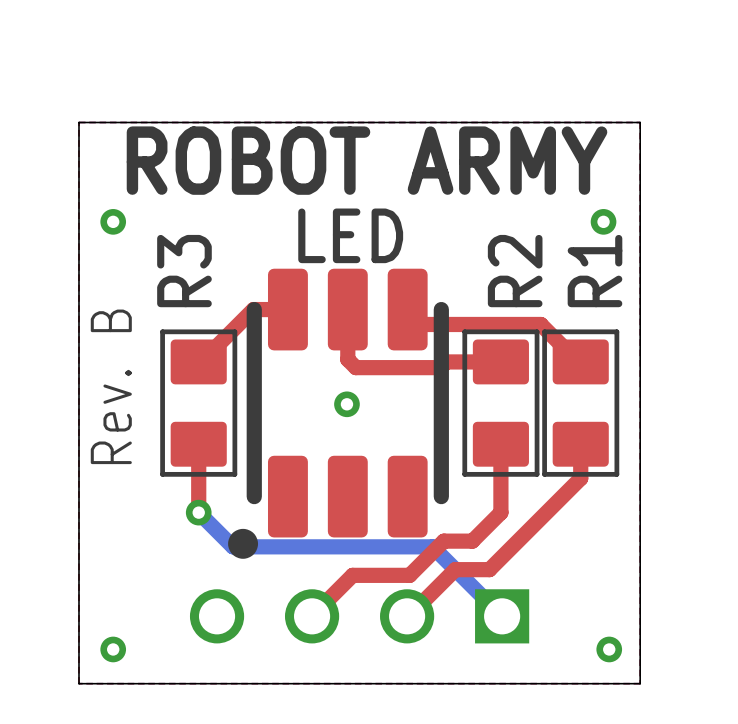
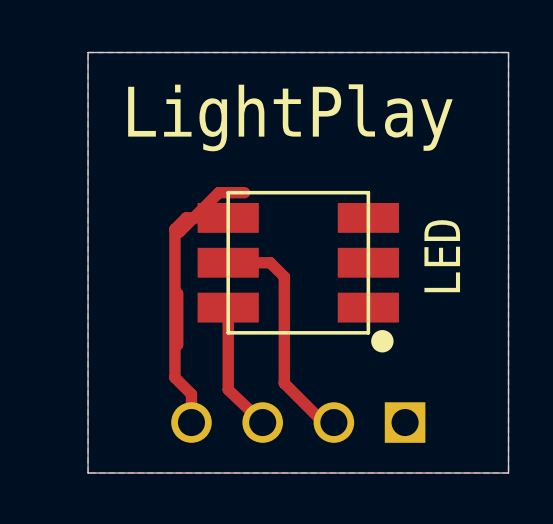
text: ROBOT ARMY (367, 160) -> none
text: none -> LightPlay (290, 117)
via: (113, 221) -> none
via: (603, 221) -> none
LED name position: LED (350, 235) -> LED (442, 256)
LED footprint: [228, 268, 449, 559] -> [197, 190, 399, 353]
top track: (347, 309) (347, 359) (355, 367) (440, 367) (446, 361) (500, 361) -> none
top track: (407, 309) (422, 324) (540, 324) (572, 356) (572, 367) (580, 361) -> none
top track: none -> (228, 217) (186, 217) (174, 229) (174, 377) (191, 394) (191, 422)
text: Rev. B (111, 386) -> none
R3: (198, 403) -> none
R2: (500, 403) -> none
R1: (580, 403) -> none
via: (346, 404) -> none
top track: (500, 444) (500, 512) (472, 541) (443, 541) (409, 575) (352, 575) (312, 615) -> (228, 307) (228, 389) (262, 422)
top track: (580, 444) (580, 478) (489, 569) (455, 569) (407, 616) -> (228, 262) (270, 262) (284, 276) (284, 383) (323, 422) (333, 422)
bottom track: (198, 512) (232, 546) (432, 546) (502, 616) -> none
via: (198, 512) -> none
via: (113, 649) -> none
via: (609, 649) -> none

